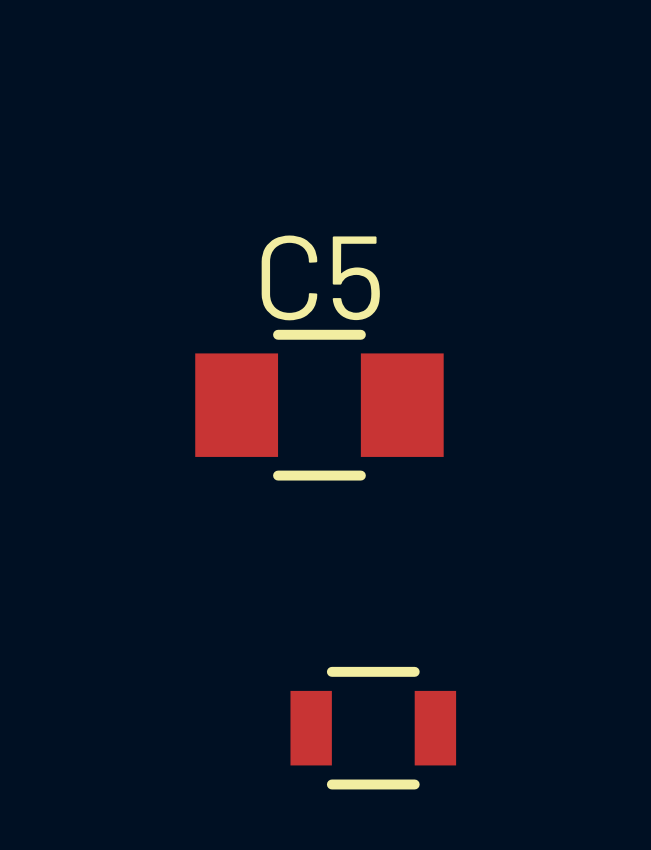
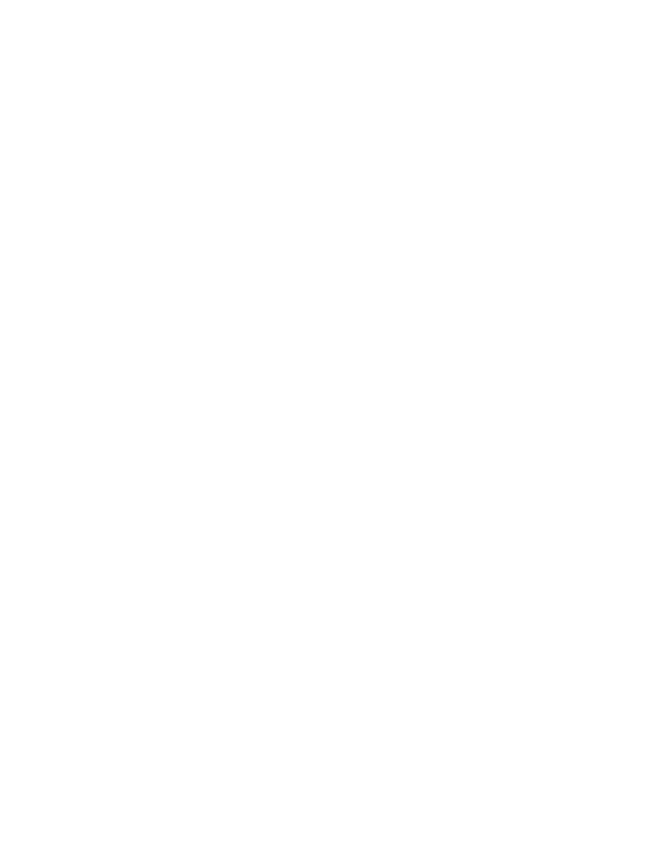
C5: (319, 405) -> none
part: (373, 728) -> none

